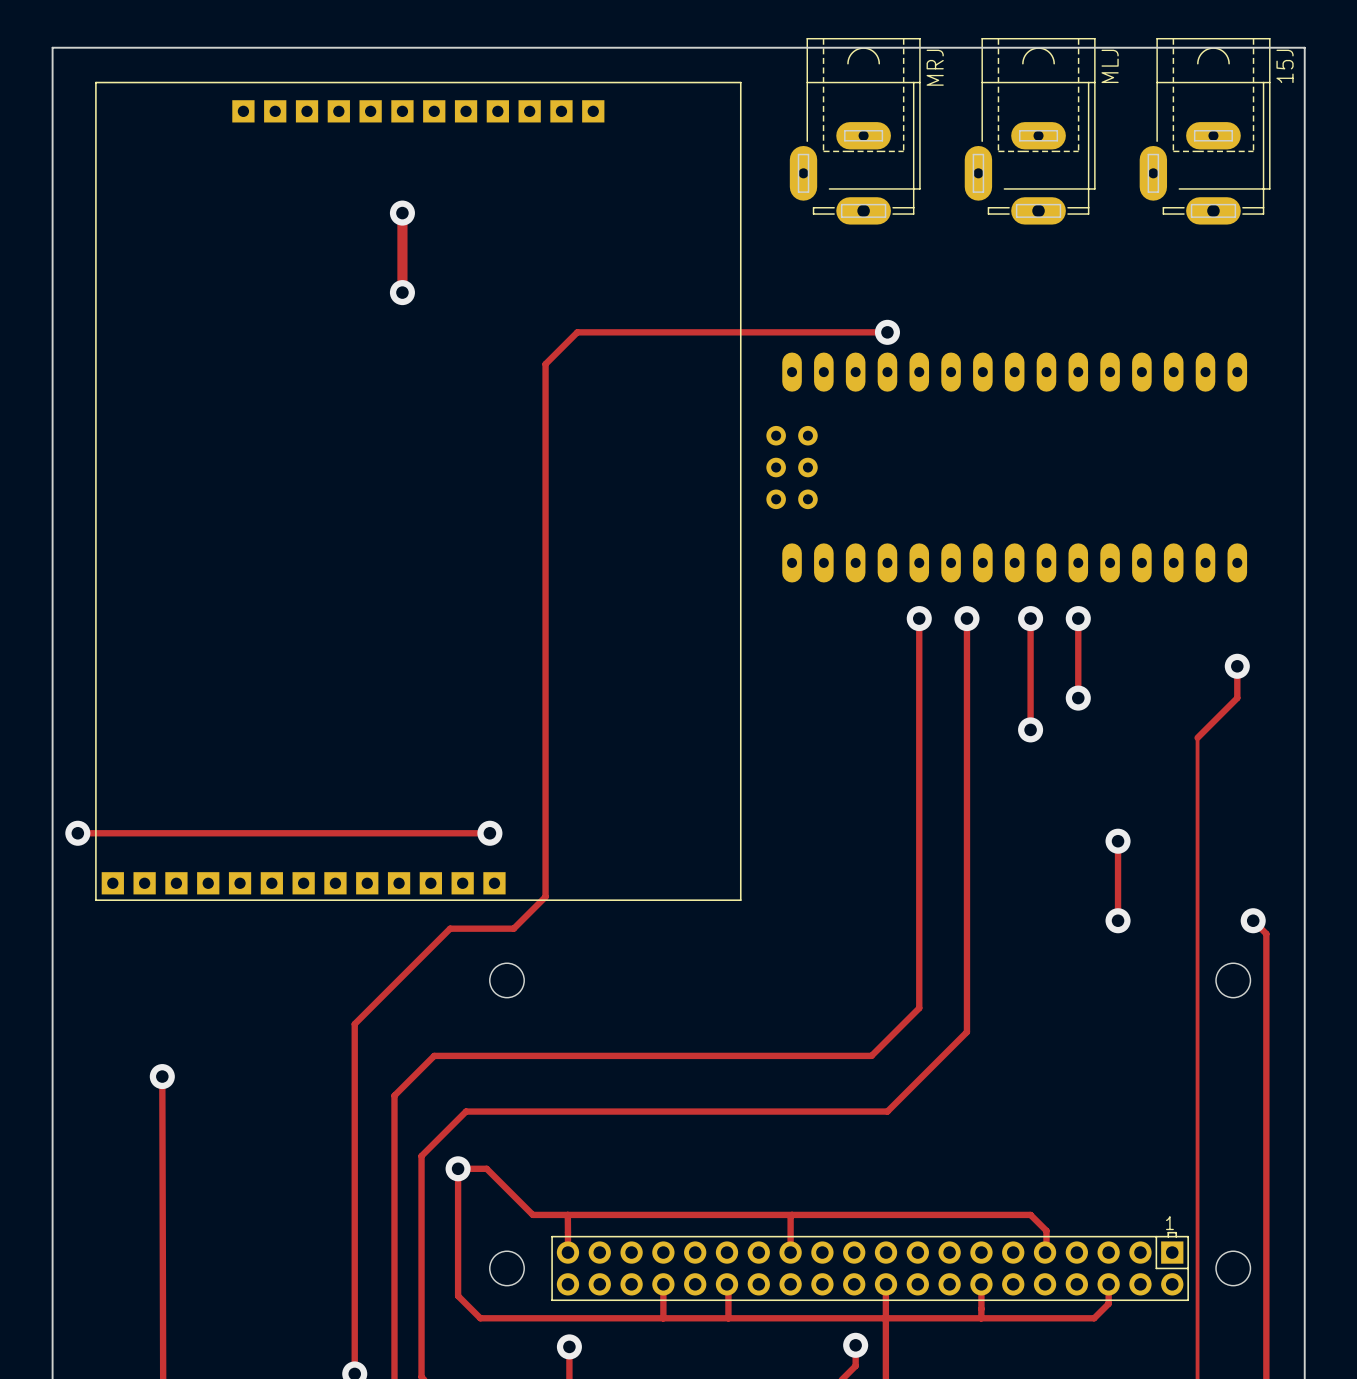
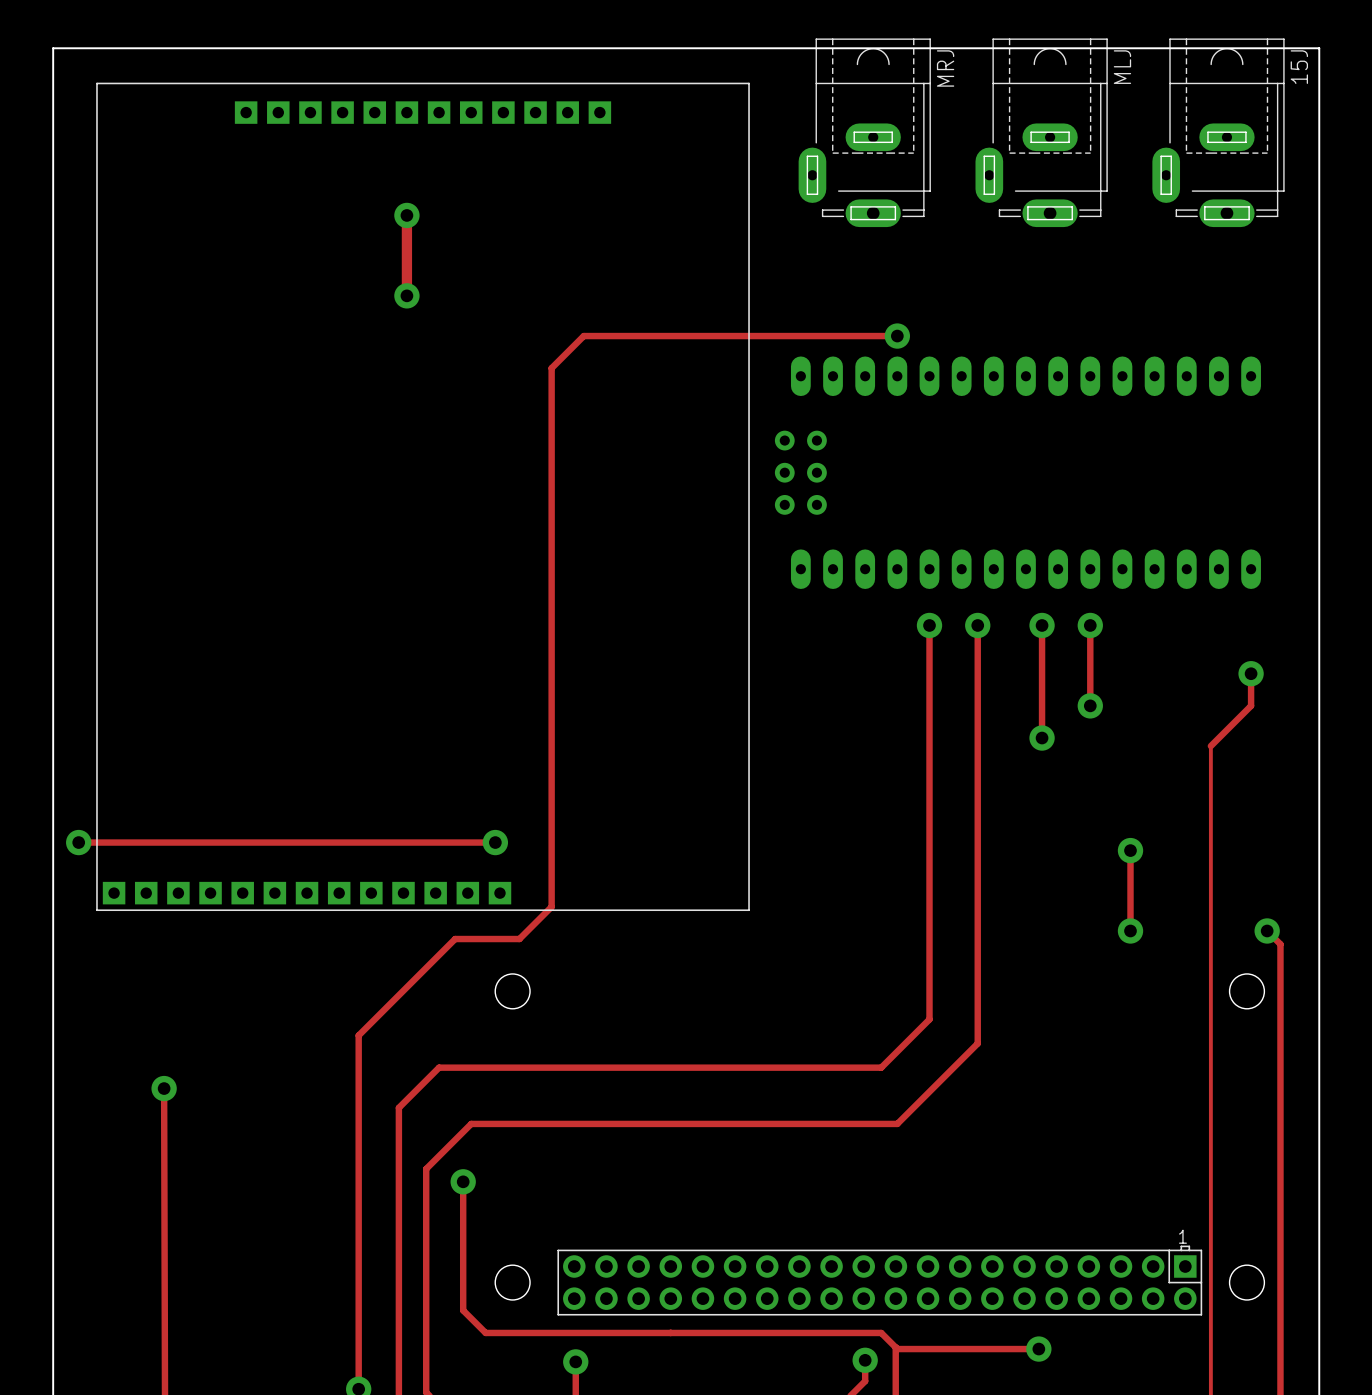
track: (458, 1168) (486, 1168) (532, 1214) (1030, 1214) (1046, 1230) (1046, 1251) -> none
track: (567, 1214) (567, 1252) -> none
track: (792, 1214) (790, 1252) -> none
track: (663, 1284) (663, 1318) -> none
track: (726, 1284) (728, 1318) -> none
track: (885, 1284) (885, 1332) -> none
track: (981, 1284) (981, 1318) -> none
track: (1108, 1284) (1108, 1303) (1094, 1318) (871, 1318) -> (1038, 1349) (897, 1349) (881, 1332)
via: none -> (1038, 1349)

